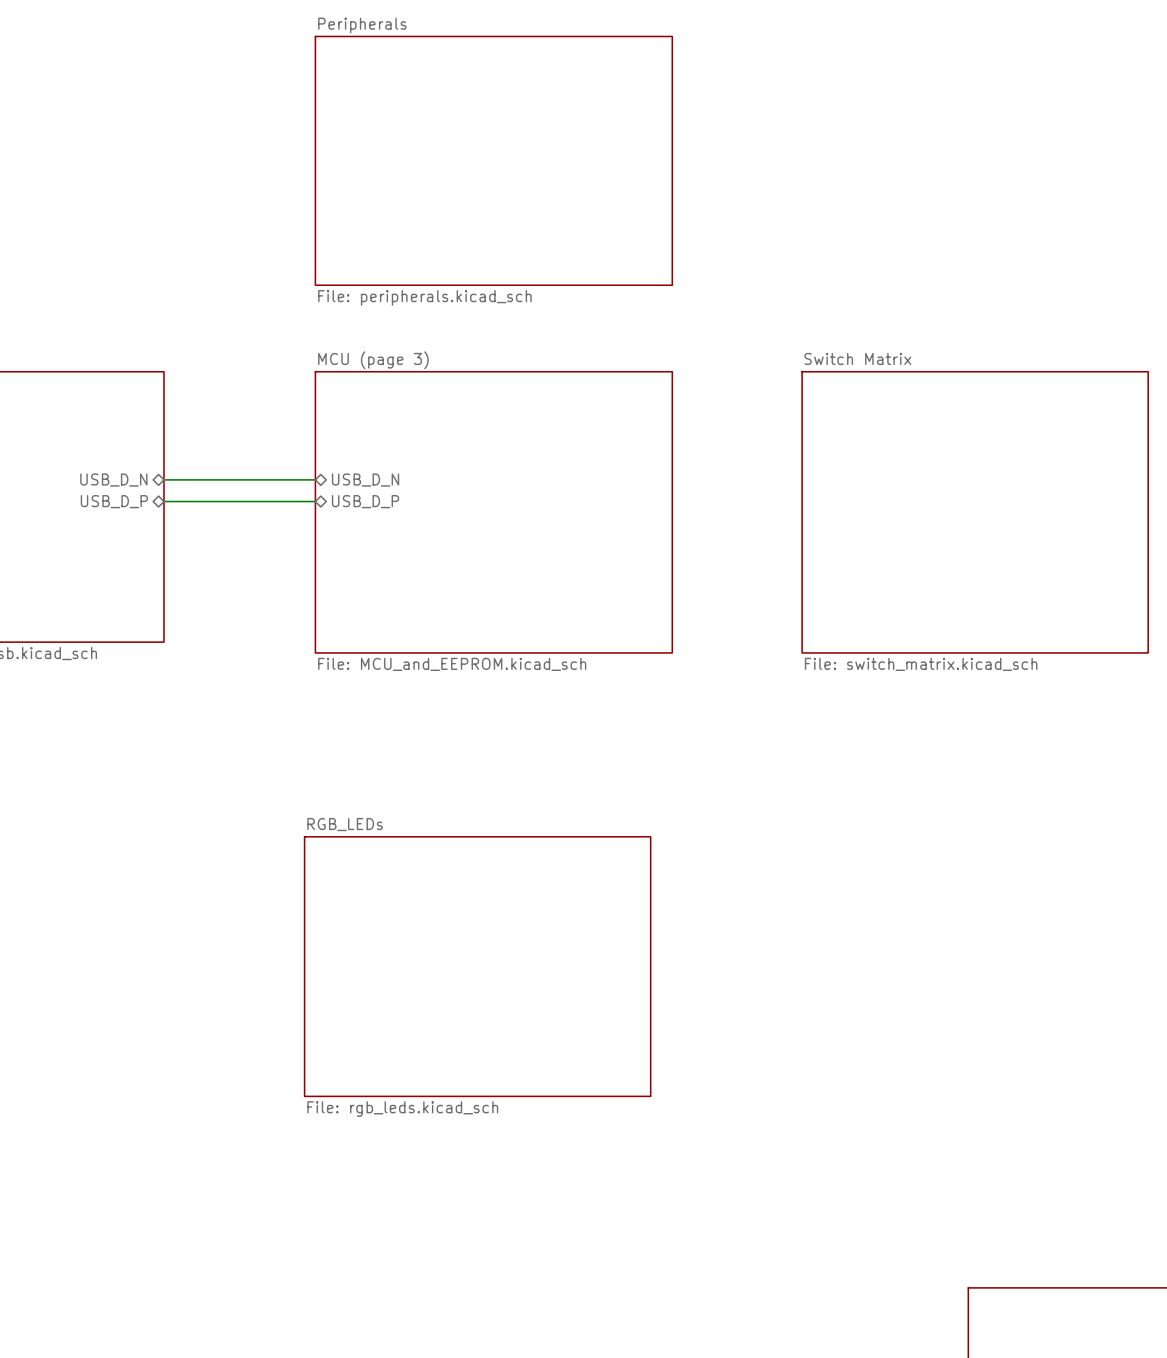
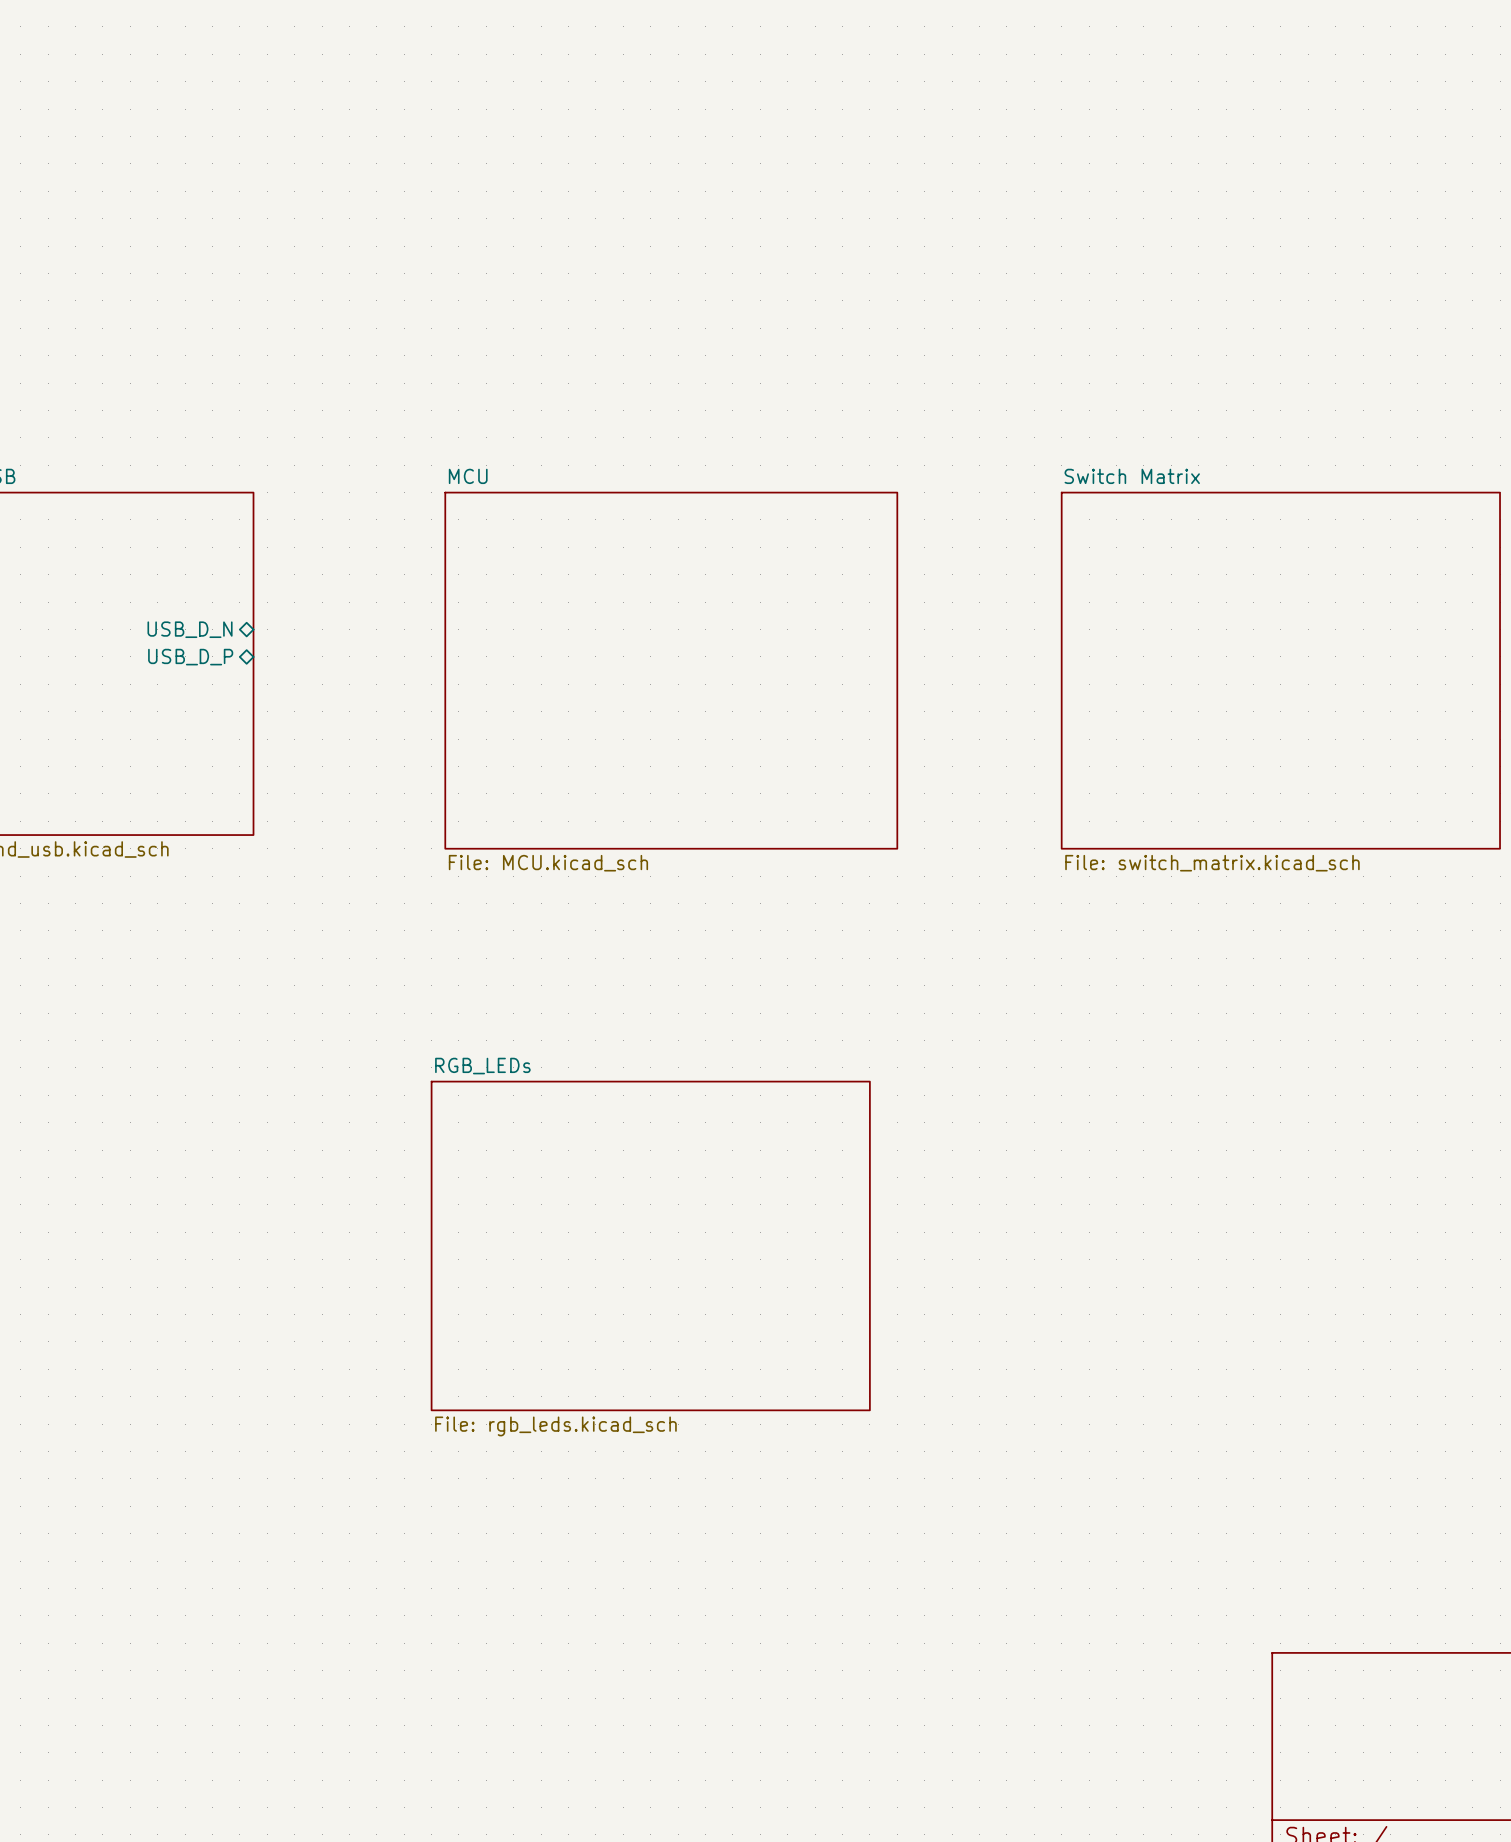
sheet Peripherals: File: peripherals.kicad_sch (493, 160) -> none
sheet MCU (page 3) name: MCU (page 3) (373, 360) -> MCU (468, 476)
wire: (163, 479) (315, 479) -> none
sheet pin: USB_D_N (365, 480) -> none
wire: (163, 501) (315, 501) -> none
sheet pin: USB_D_P (365, 501) -> none
sheet MCU (page 3) value: File: MCU_and_EEPROM.kicad_sch (452, 664) -> File: MCU.kicad_sch (548, 863)

